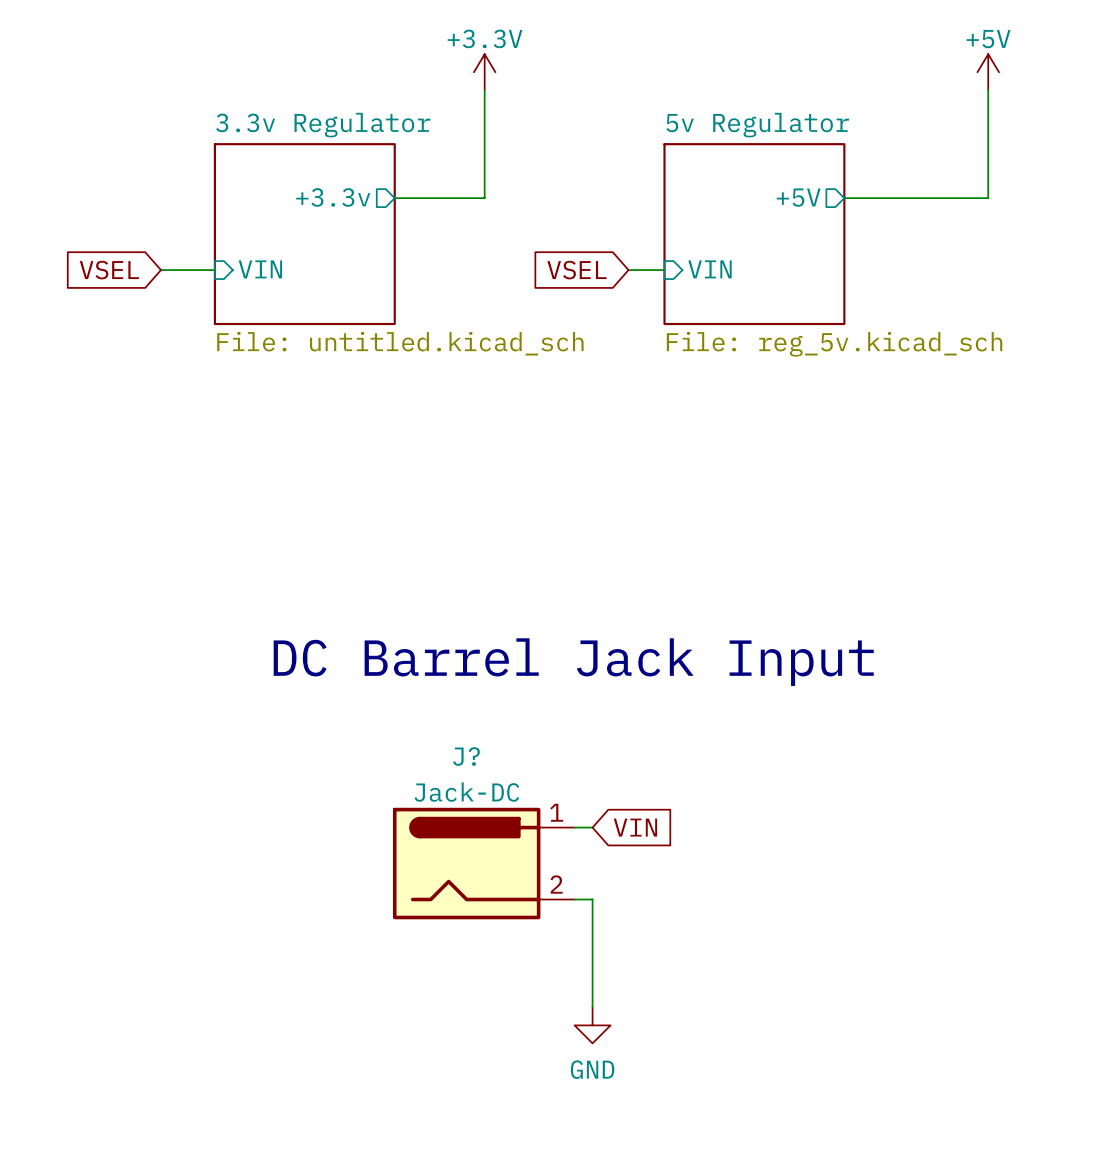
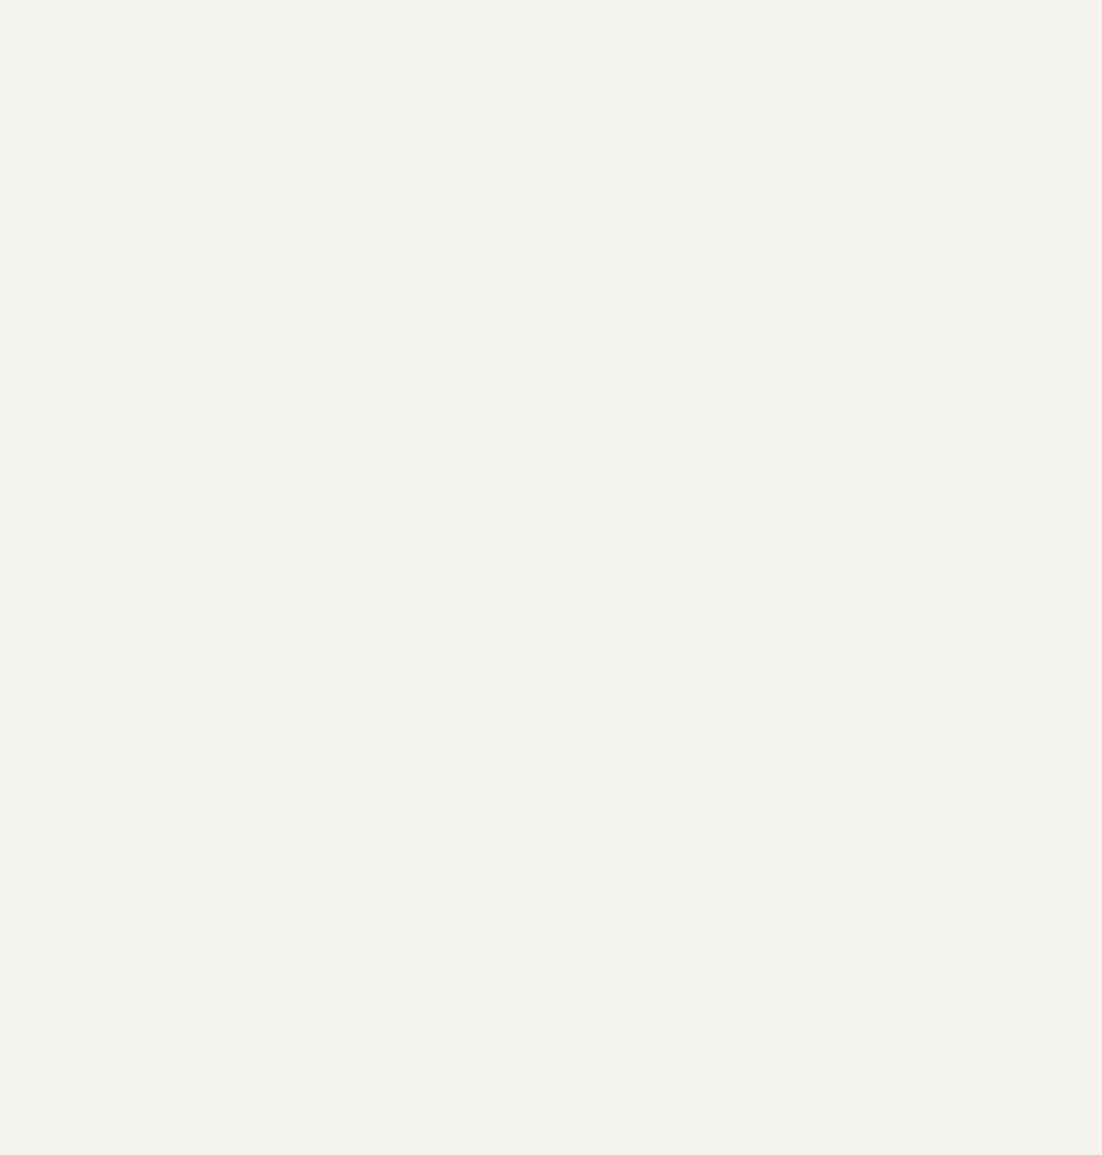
power symbol: +3.3V (484, 72) -> none
power symbol: +5V (988, 72) -> none
wire: (484, 90) (484, 198) (394, 198) -> none
wire: (988, 90) (988, 198) (844, 198) -> none
sheet pin: +3.3v (333, 197) -> none
sheet pin: +5V (798, 197) -> none
sheet 3.3v Regulator: File: untitled.kicad_sch (304, 234) -> none
sheet 5v Regulator: File: reg_5v.kicad_sch (754, 234) -> none
sheet pin: VIN (260, 269) -> none
sheet pin: VIN (709, 269) -> none
global label: VSEL (109, 270) -> none
wire: (160, 270) (214, 270) -> none
global label: VSEL (577, 270) -> none
wire: (628, 270) (664, 270) -> none
text: DC Barrel Jack Input (573, 662) -> none
wire: (574, 827) (592, 827) -> none
global label: VIN (635, 827) -> none
J?: Jack-DC (483, 863) -> none
wire: (574, 899) (592, 899) (592, 1007) -> none
power symbol: GND (592, 1025) -> none

